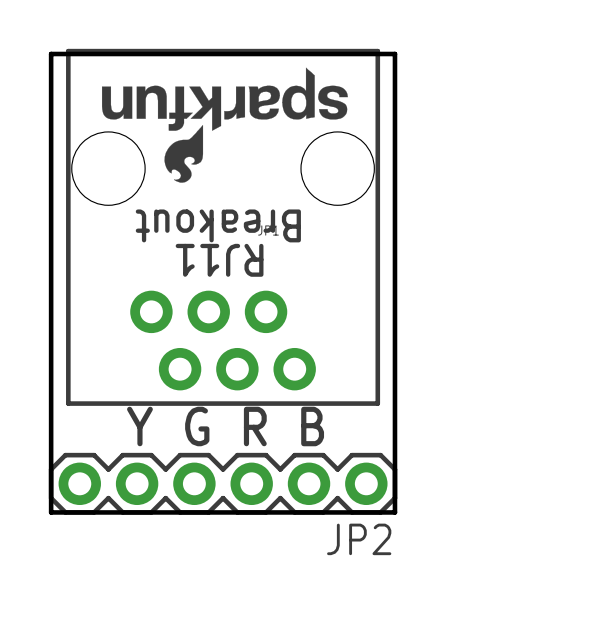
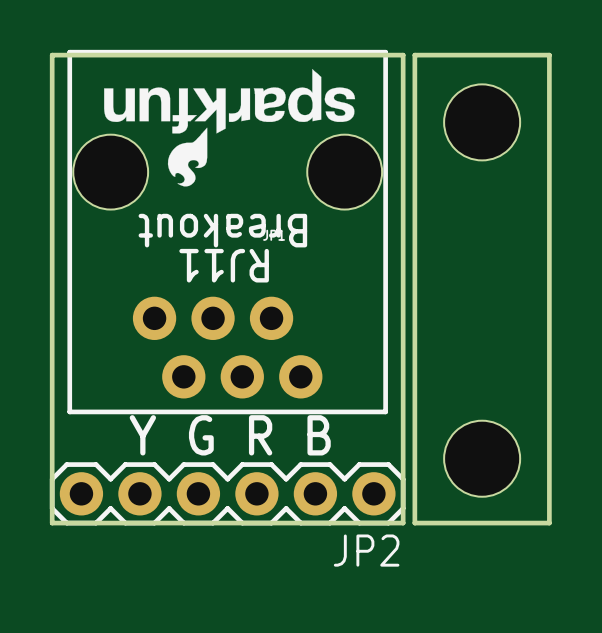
board edge: none -> (414, 55) (549, 55) (549, 523) (414, 523) (414, 55)
part: none -> (482, 122)
part: none -> (482, 458)

